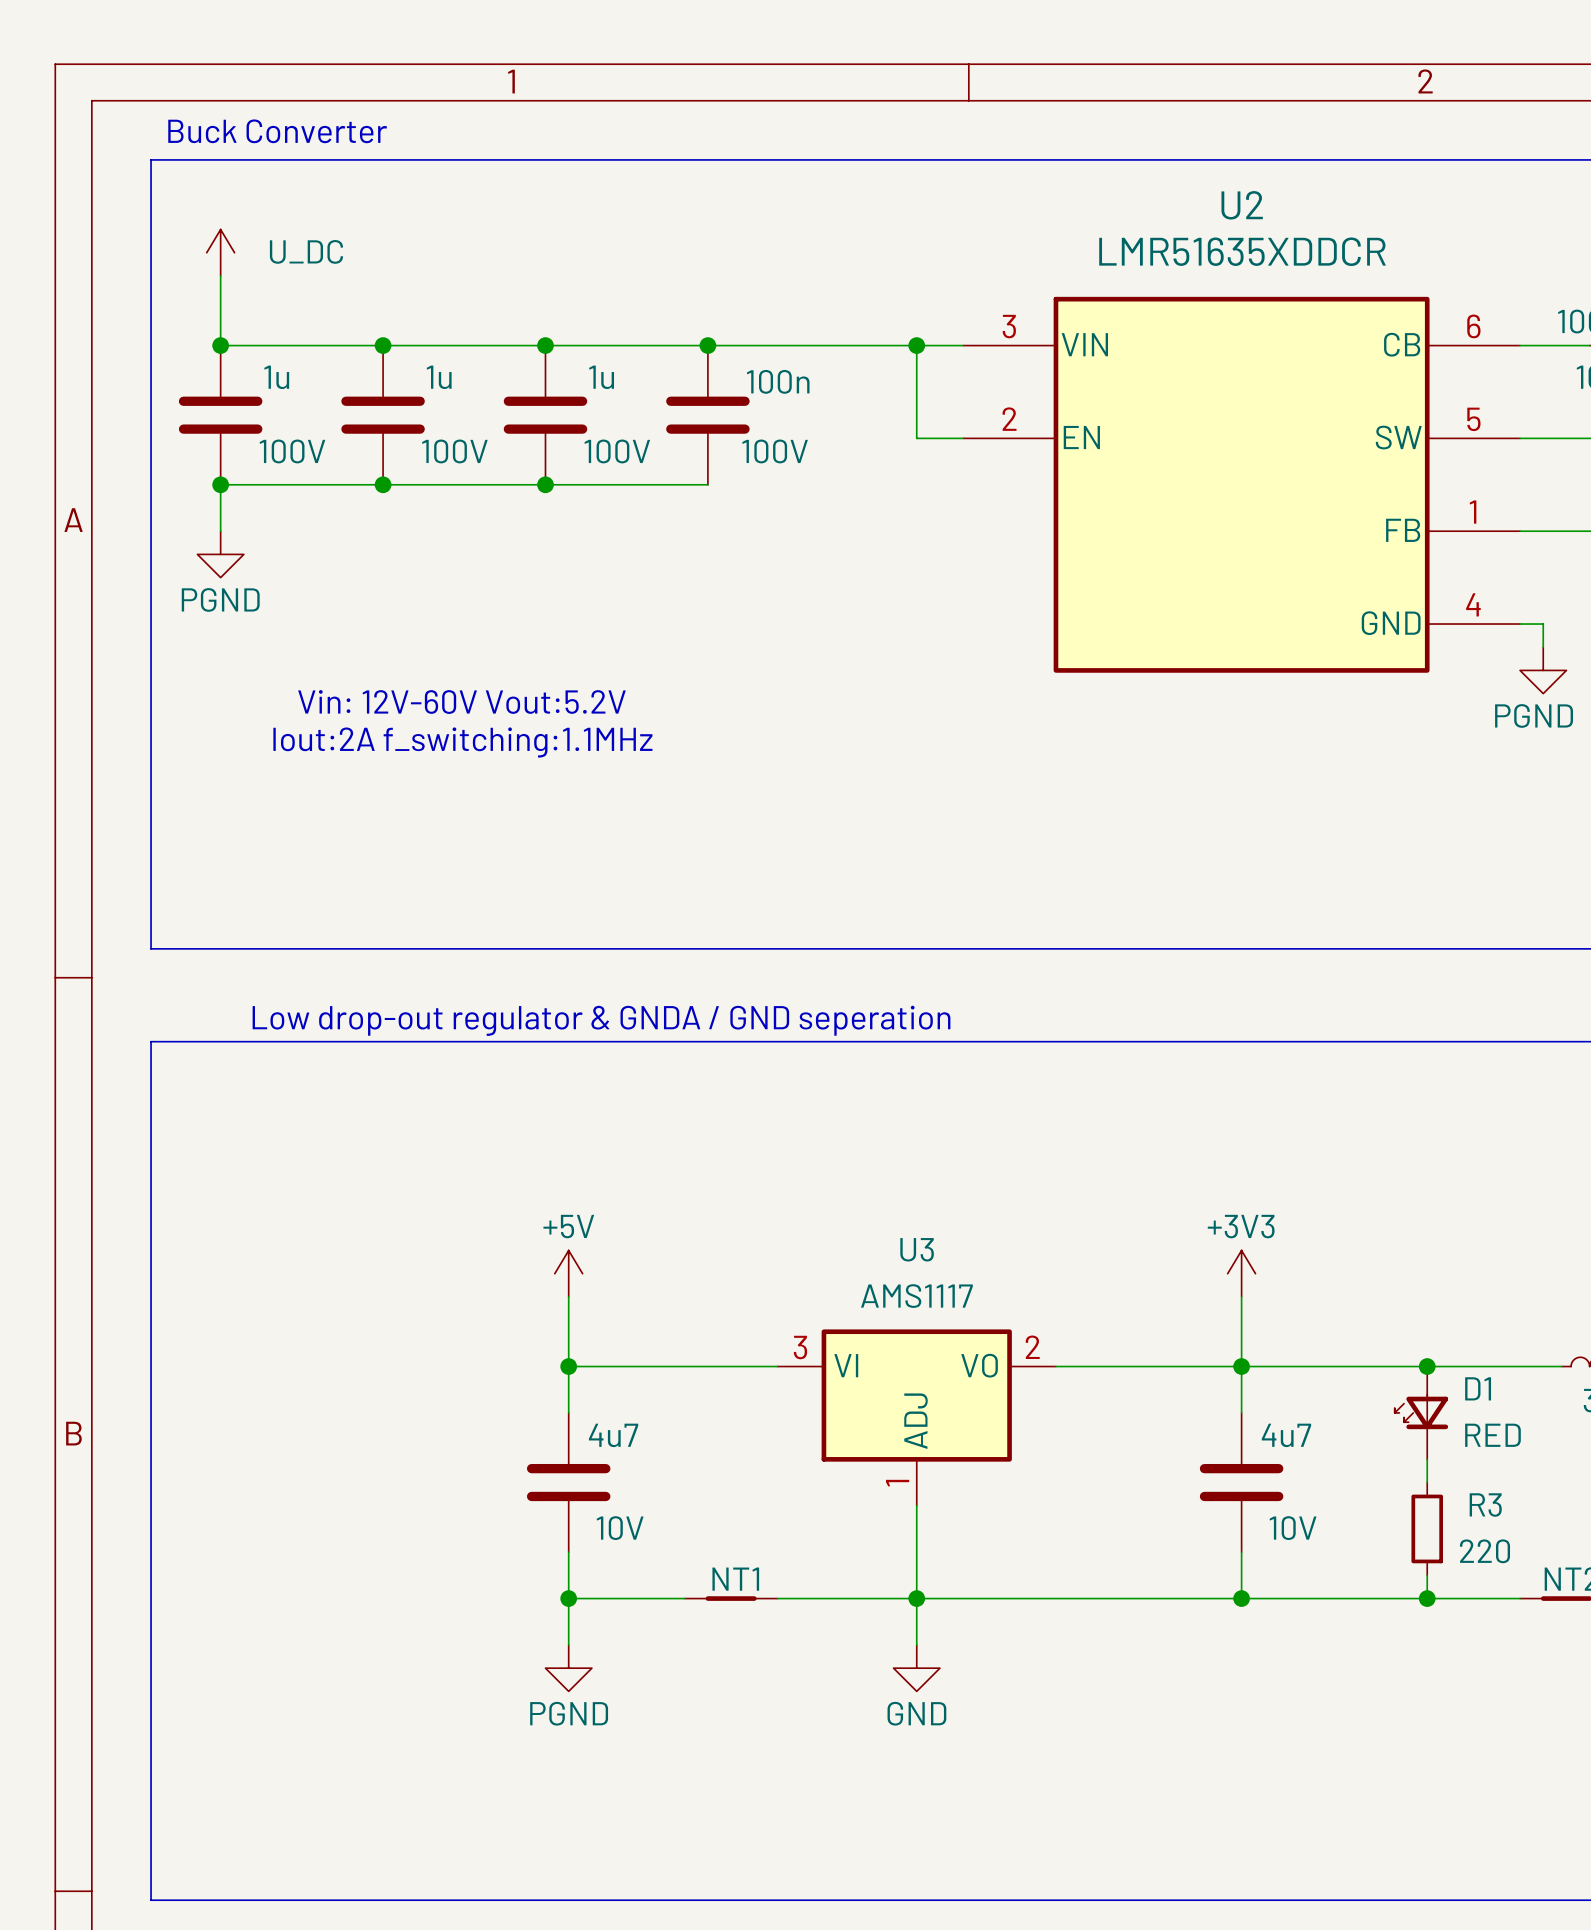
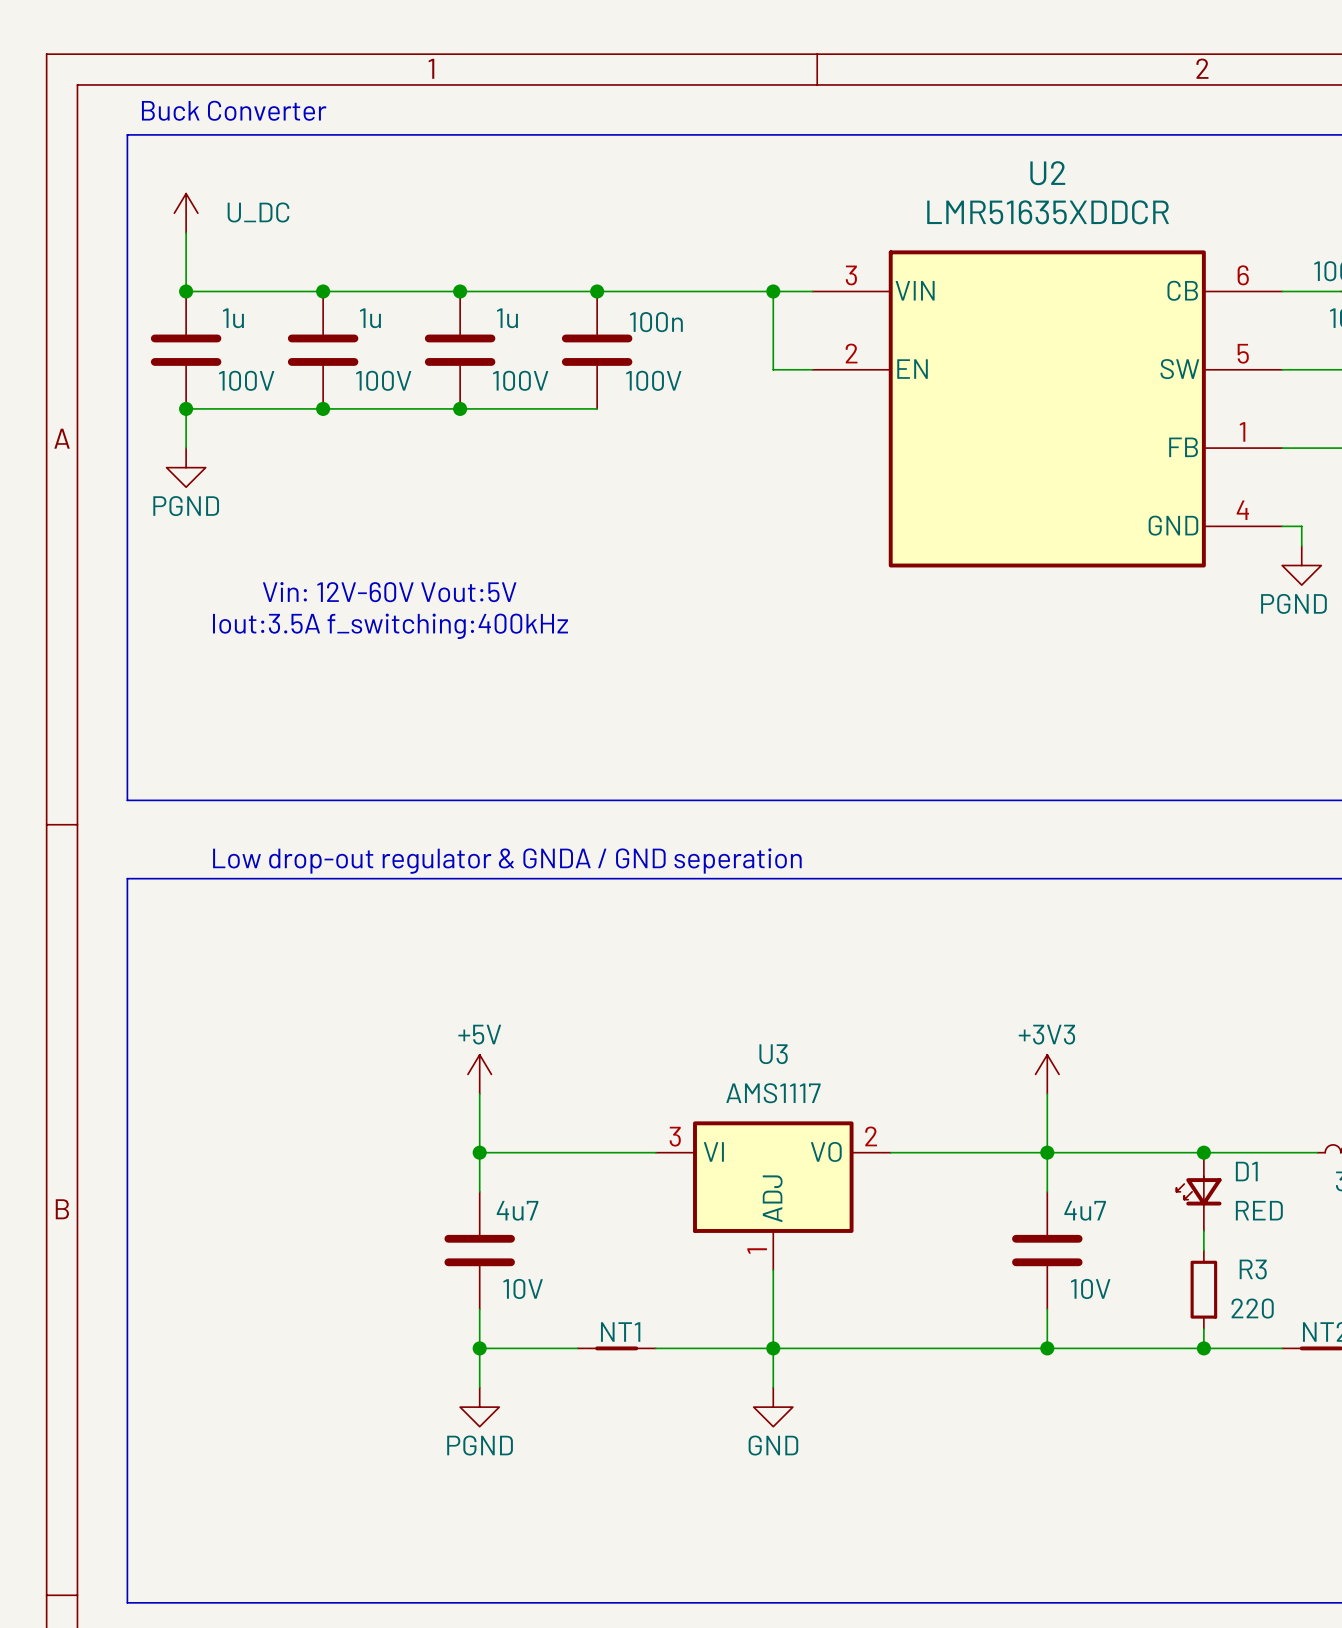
text: Vin: 12V-60V Vout:5.2V (461, 702) -> Vin: 12V-60V Vout:5V (389, 592)
text: Iout:2A f_switching:1.1MHz (462, 742) -> Iout:3.5A f_switching:400kHz (390, 626)

